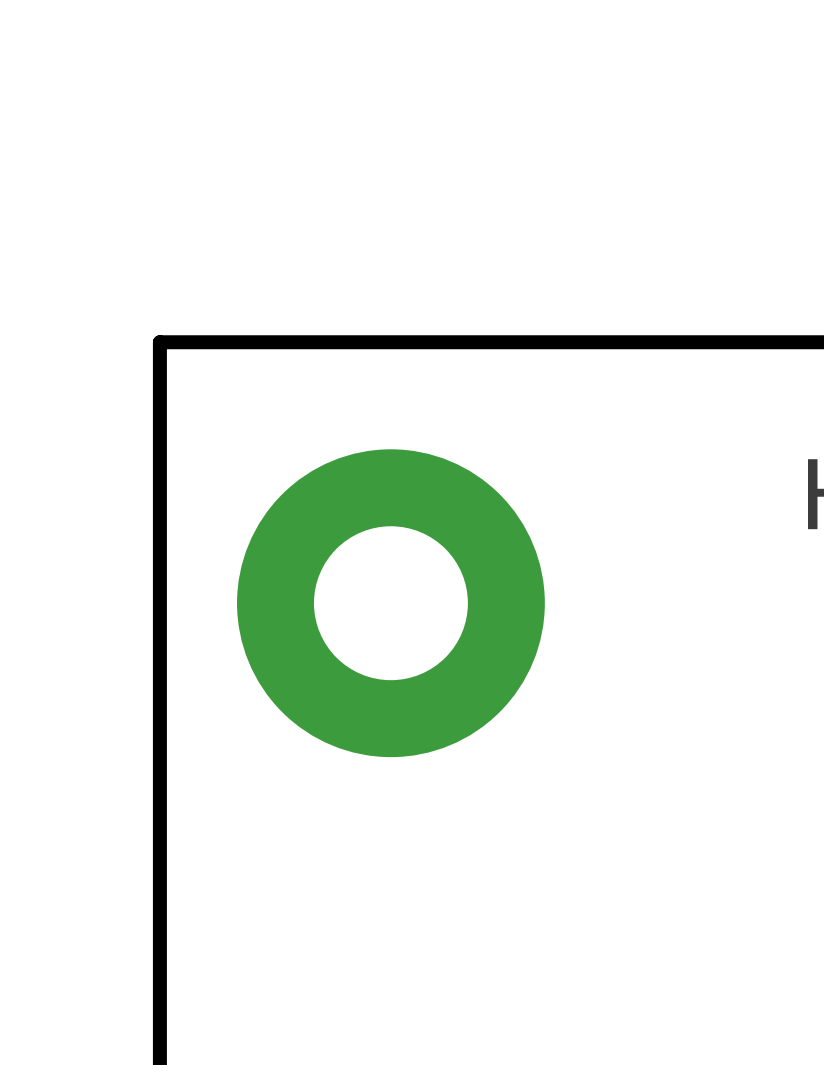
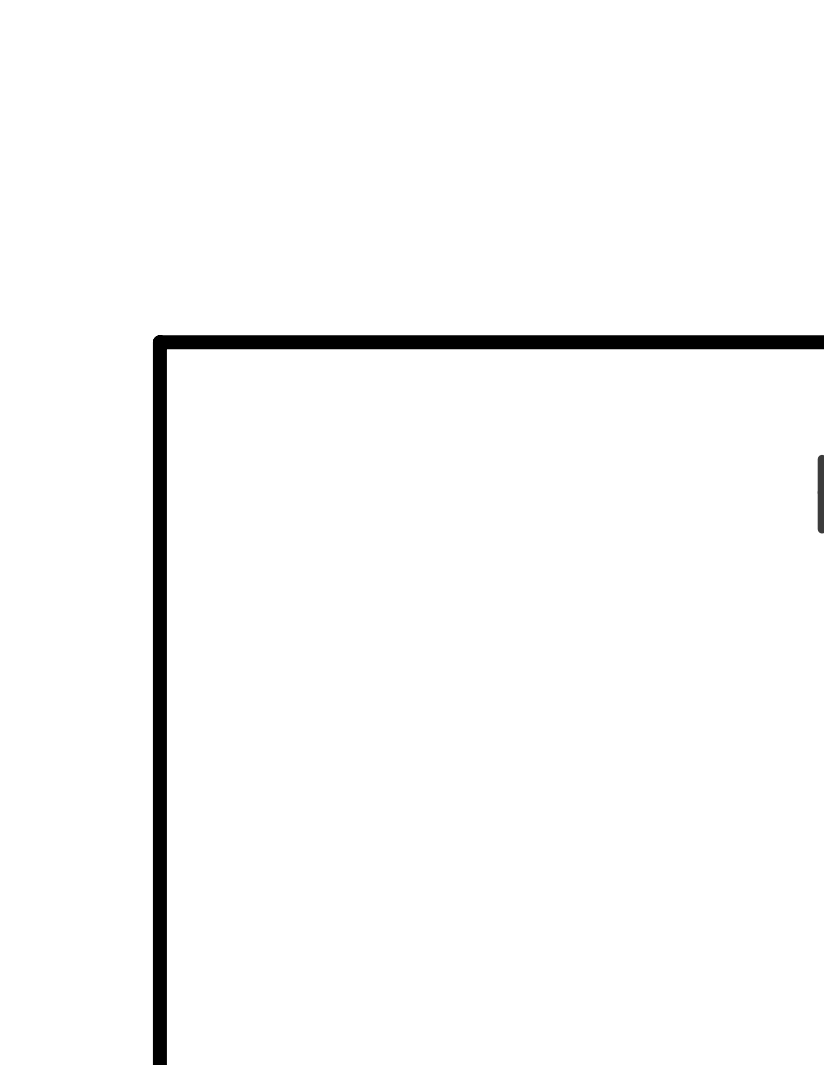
part: (390, 603) -> none

